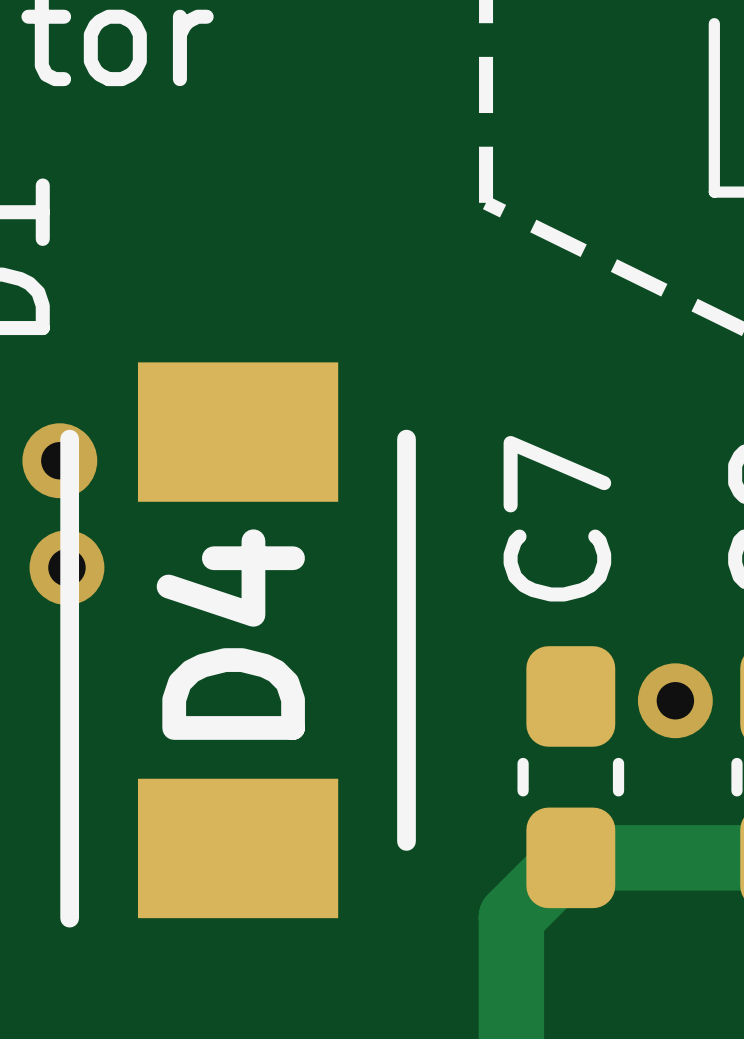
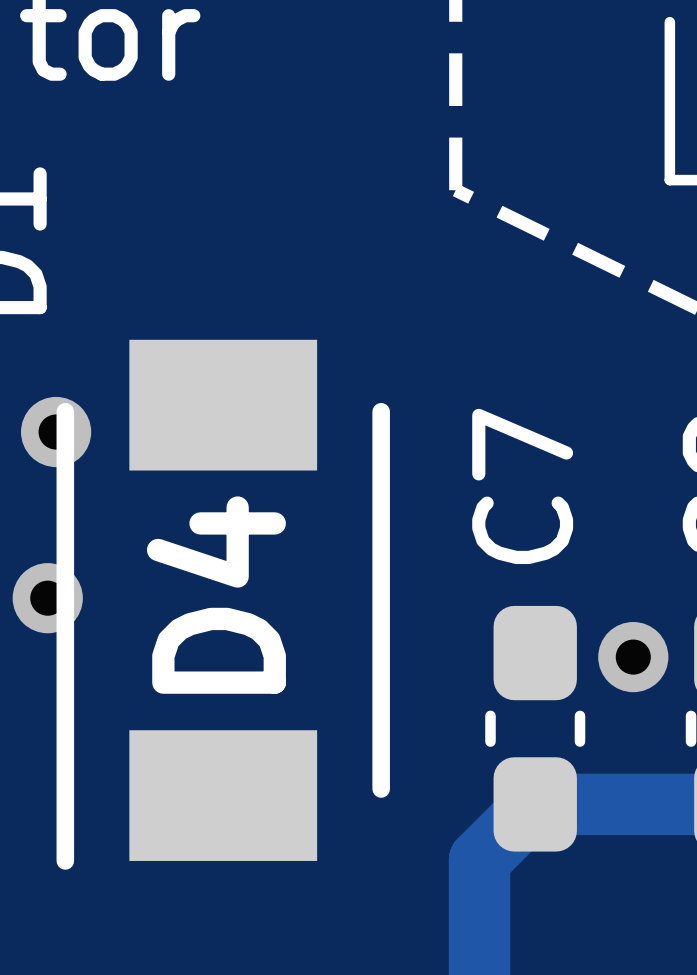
via position: (66, 567) -> (47, 598)

